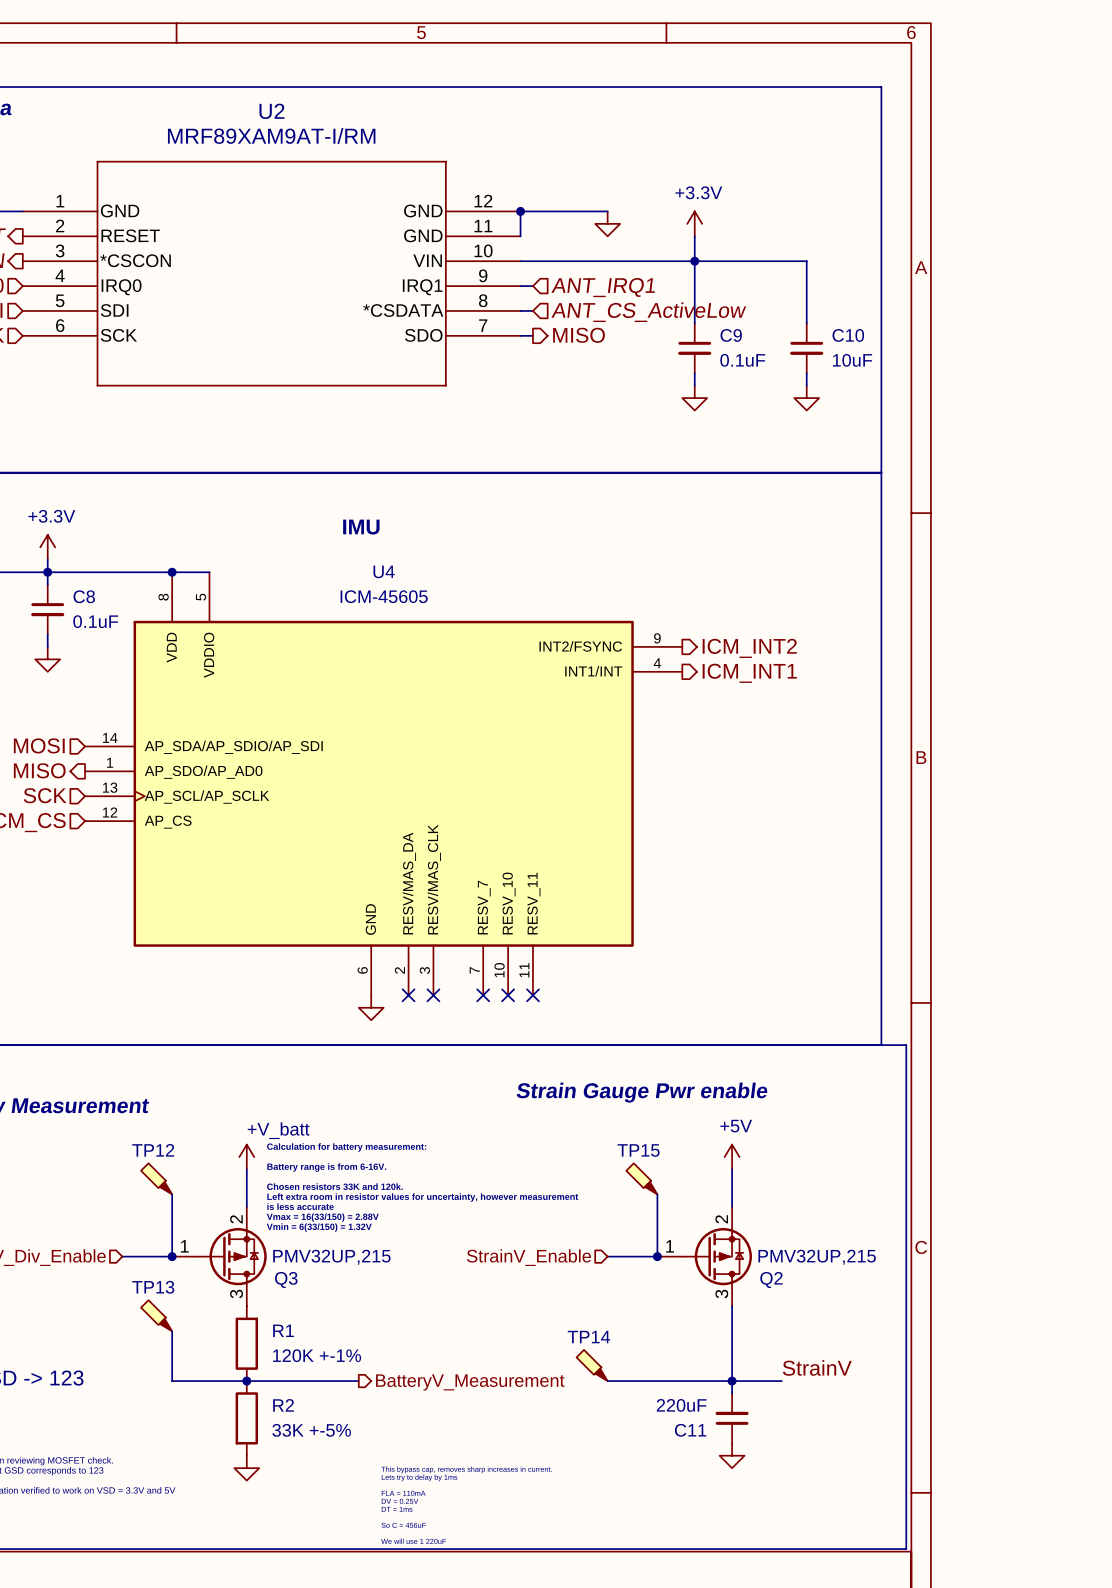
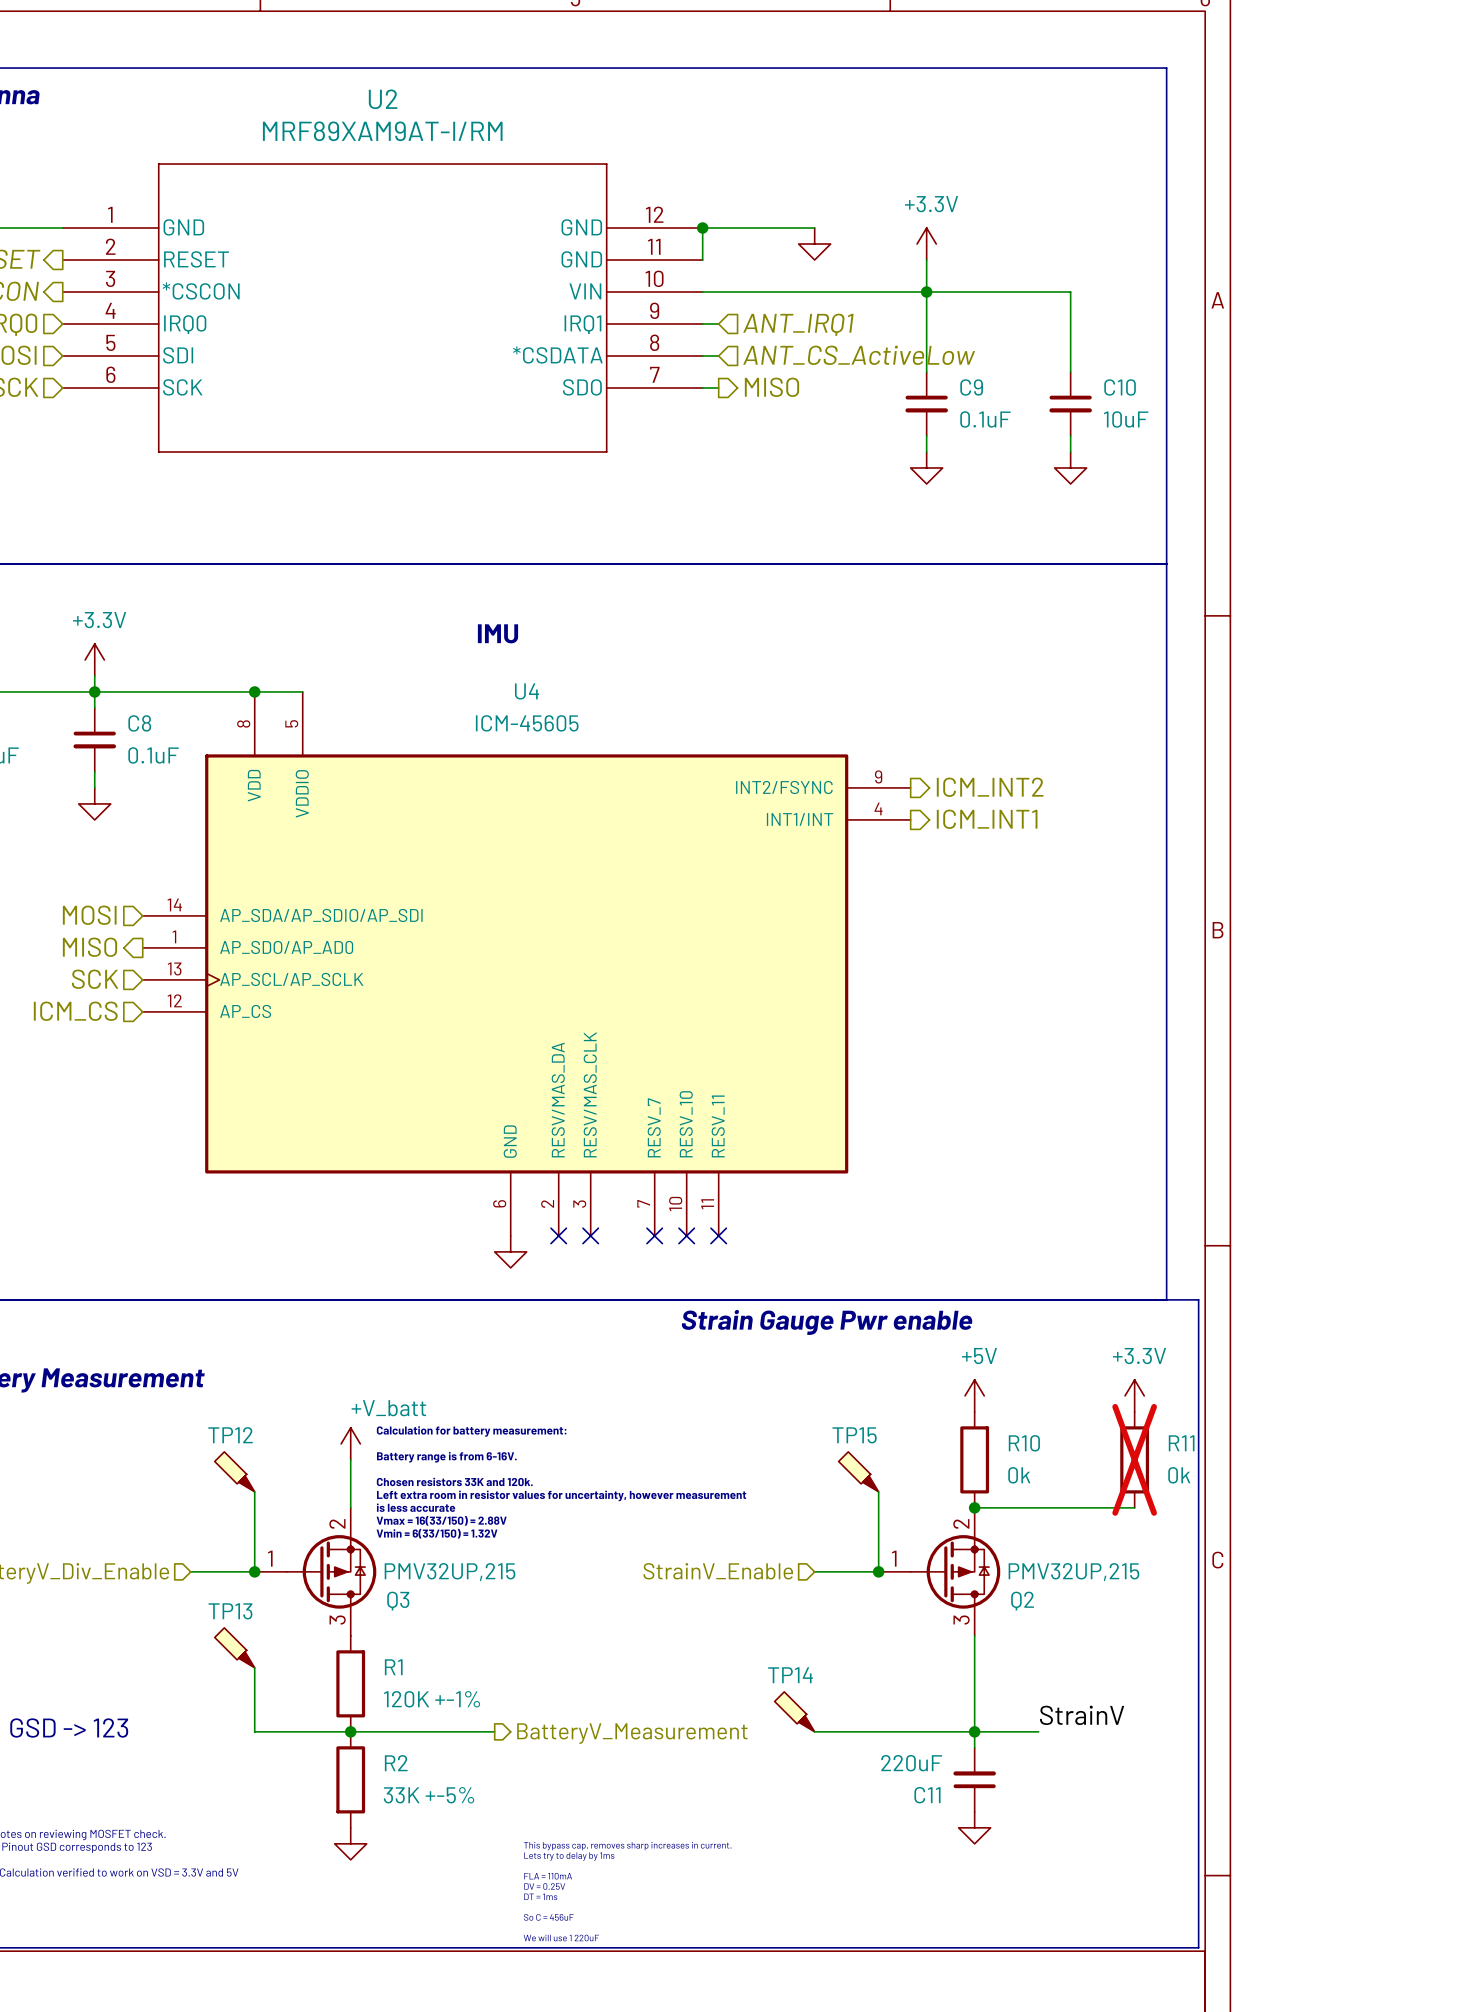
text position: Strain Gauge Pwr enable (642, 1092) -> Strain Gauge Pwr enable (826, 1322)
power symbol: none -> +3.3V (1134, 1395)
power symbol position: +5V (732, 1157) -> +5V (974, 1395)
wire: (732, 1169) (732, 1206) -> (1134, 1507) (974, 1507)
R10: none -> 0k (974, 1459)
R11: none -> 0k (1134, 1459)
junction: none -> (974, 1507)

